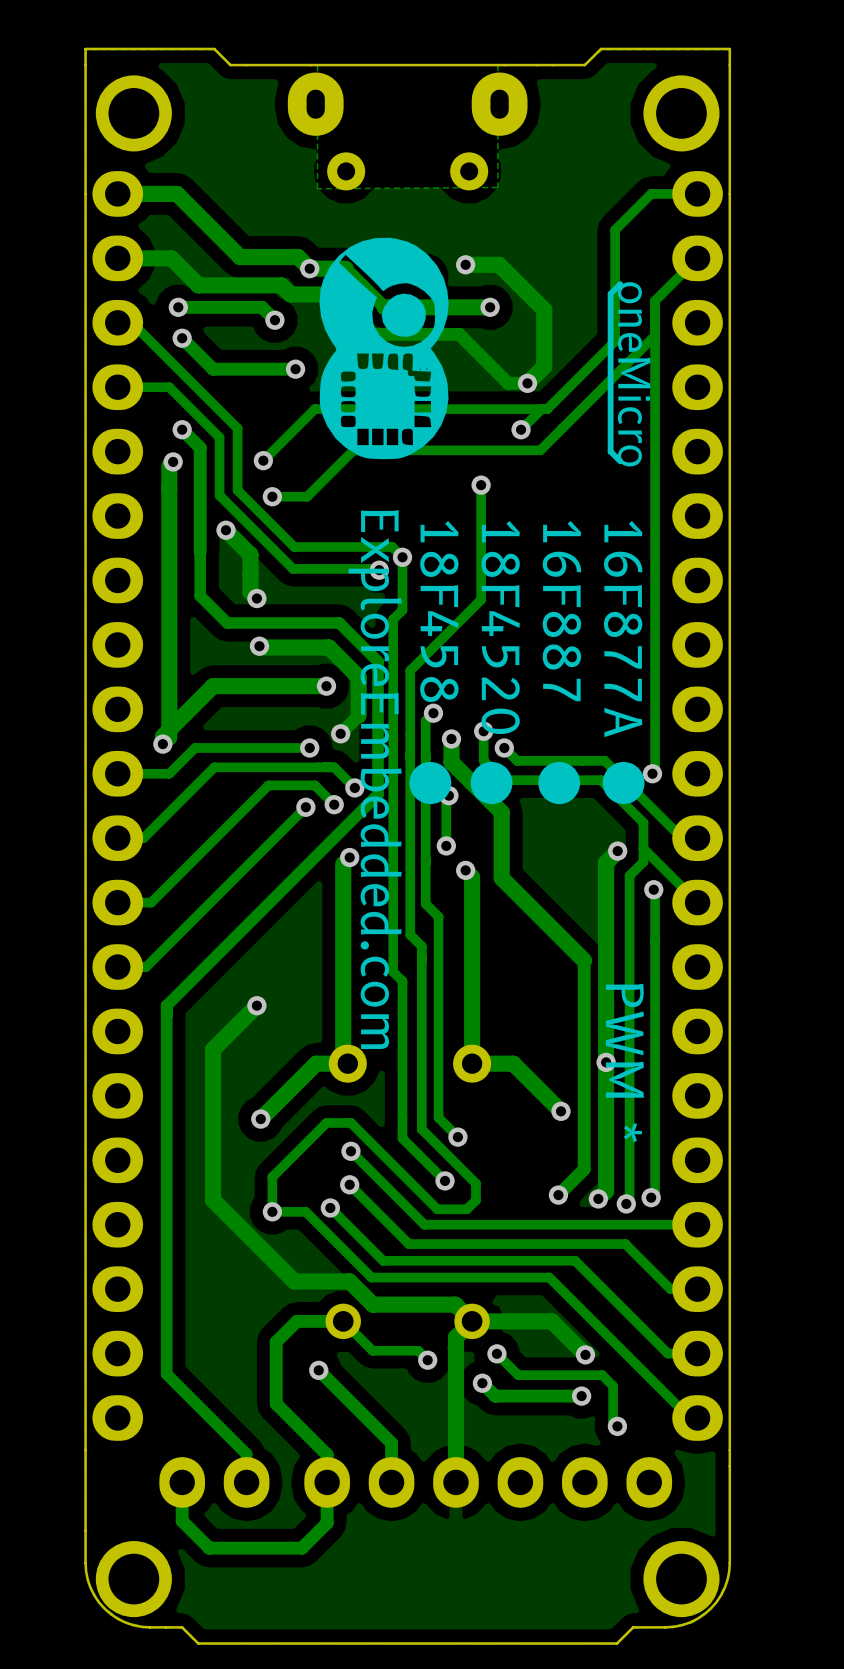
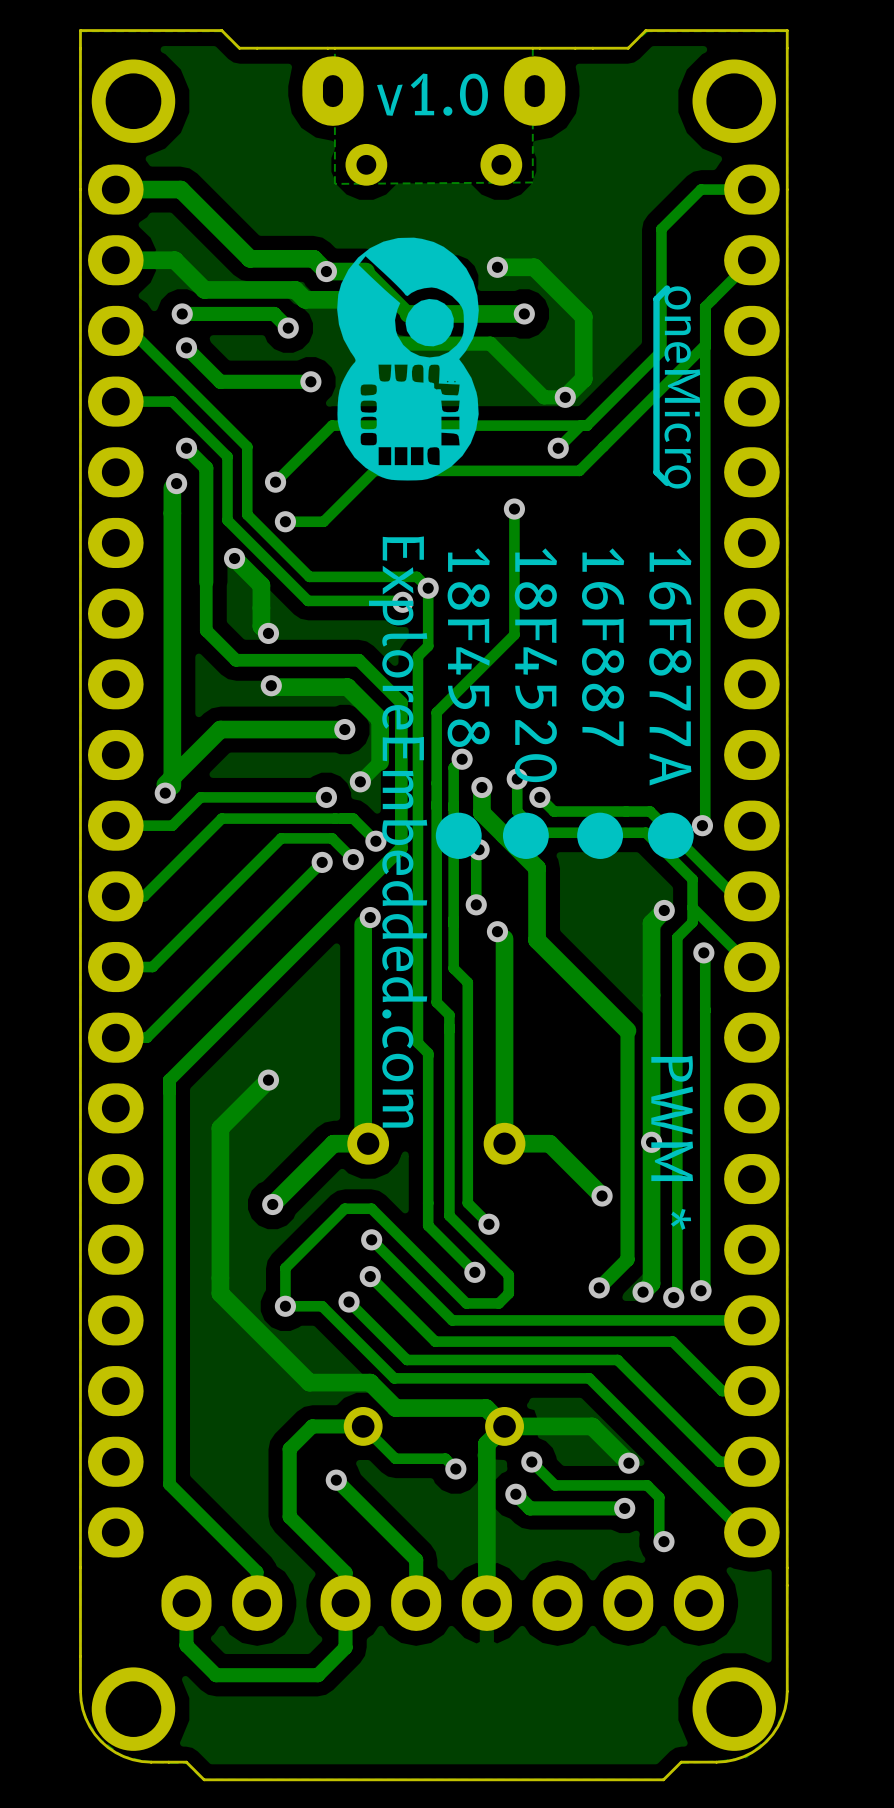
text: none -> v1.0 (432, 94)

